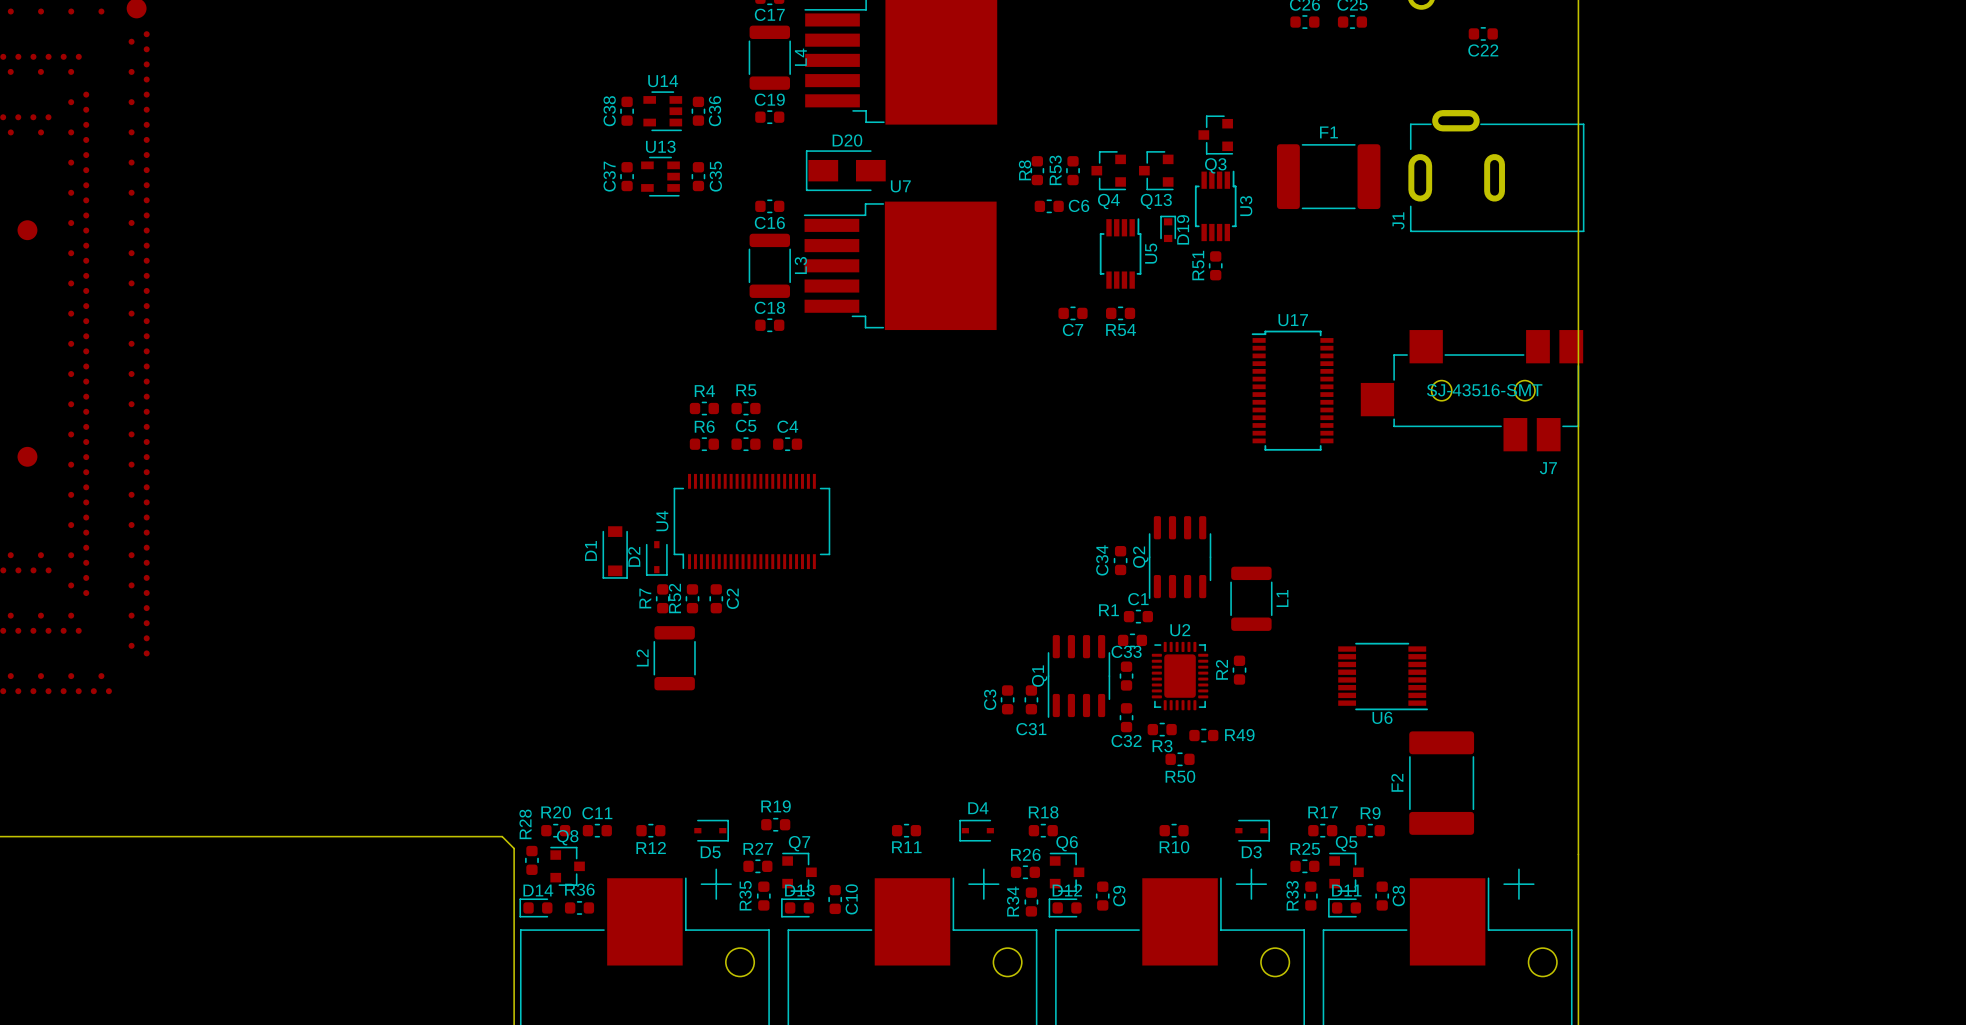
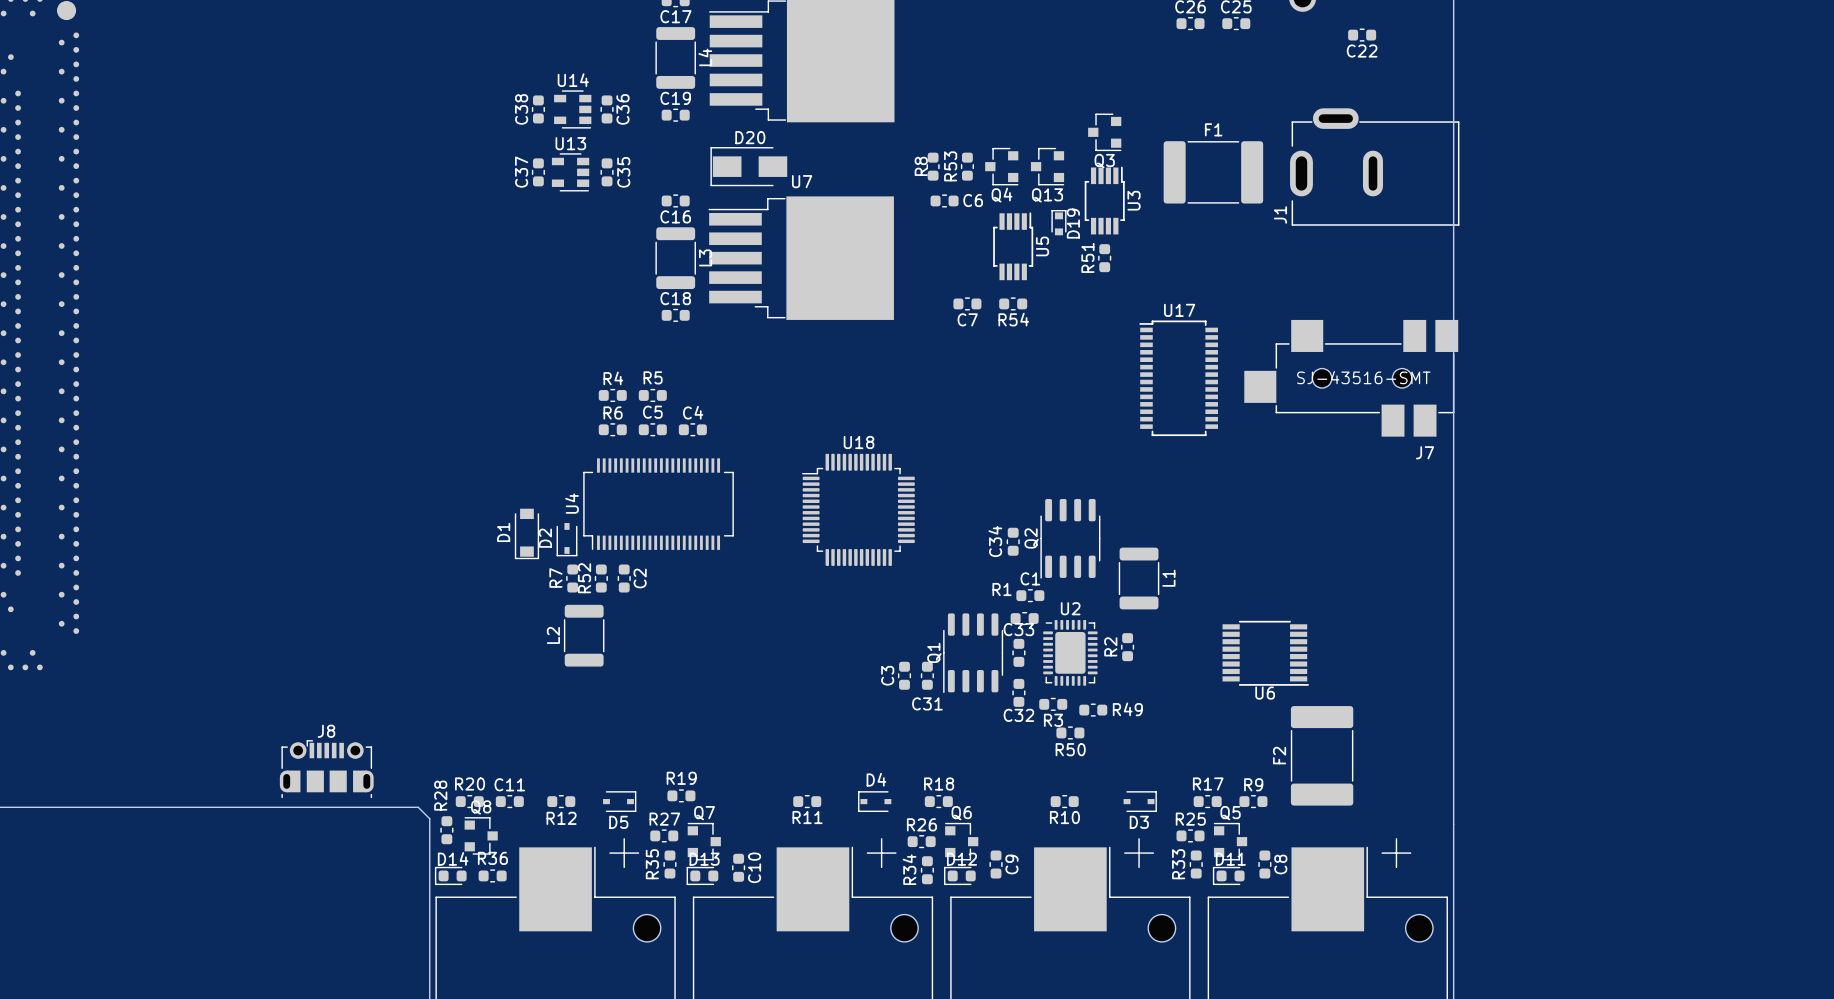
U18: none -> (858, 509)
J8: none -> (326, 769)

